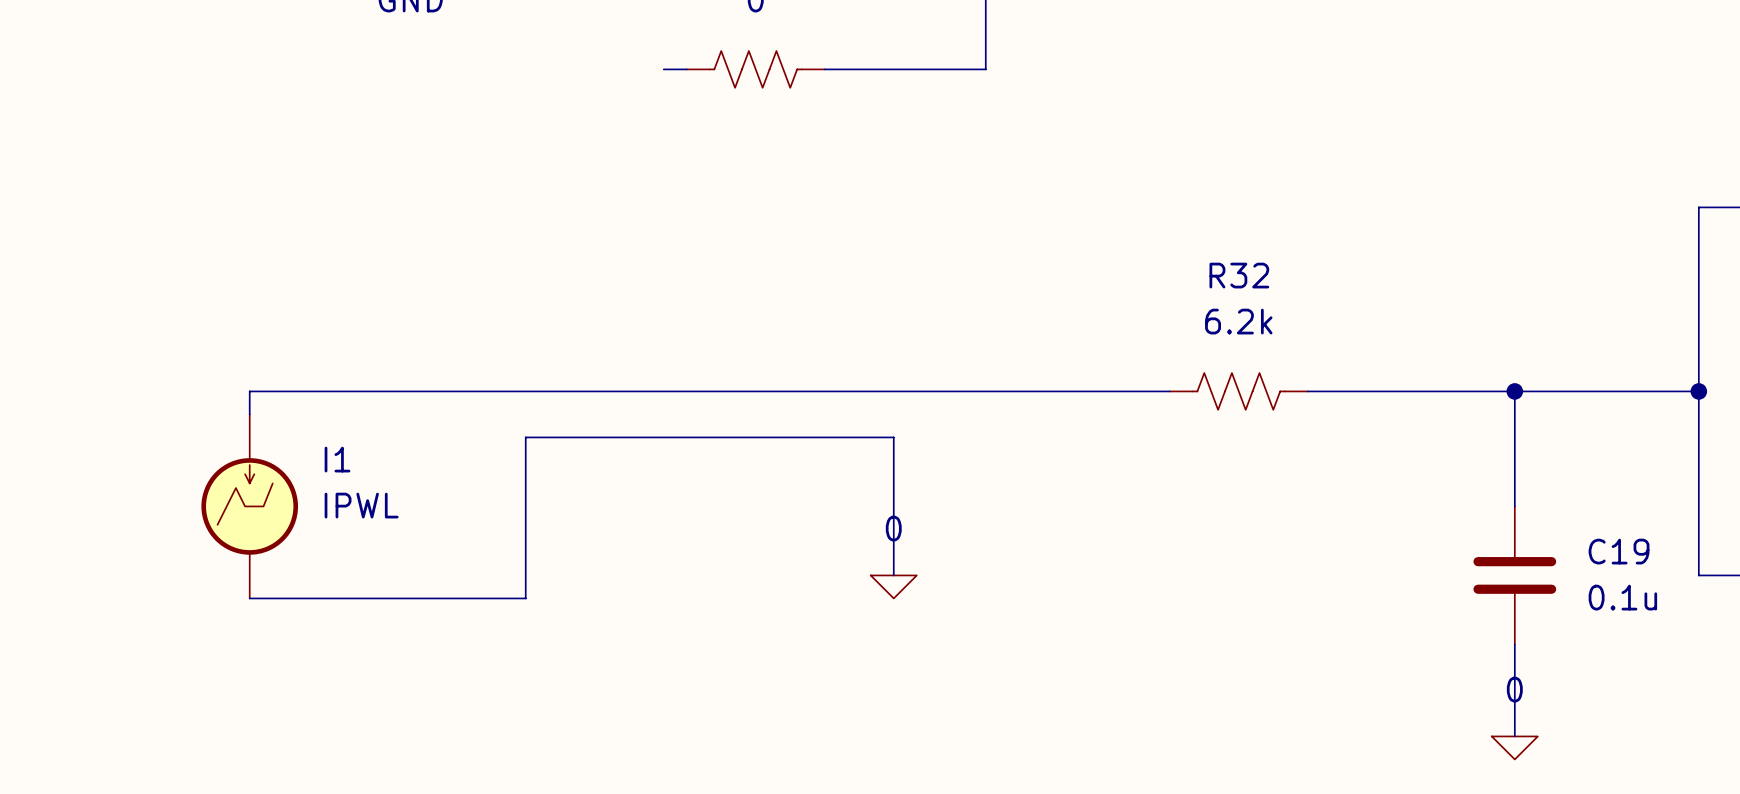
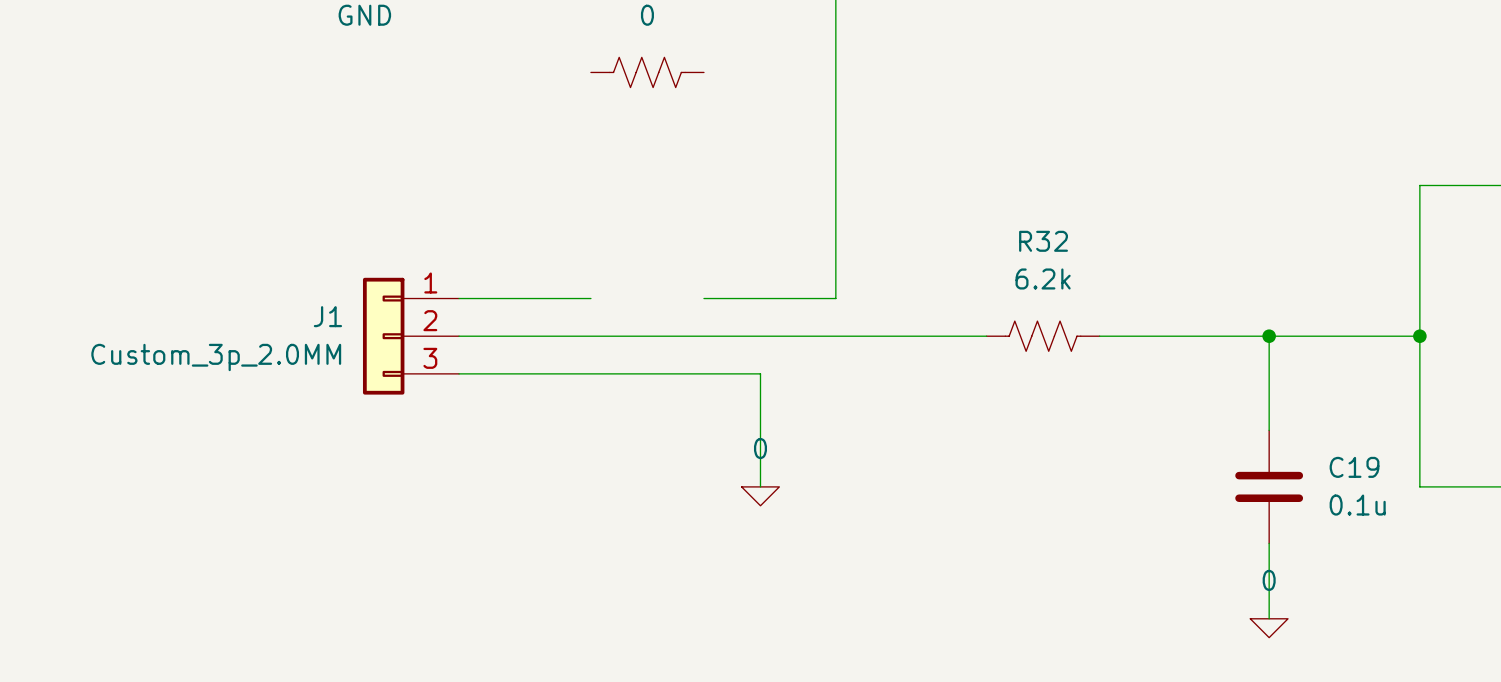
wire: (663, 69) (686, 69) -> none
wire: (824, 69) (985, 69) -> (703, 298) (835, 298) (835, 72)
wire: none -> (459, 298) (590, 298)
J1: none -> Custom_3p_2.0MM (411, 336)
wire: (525, 391) (249, 391) (249, 414) -> none
wire: (525, 437) (525, 598) (249, 598) -> none
I1: IPWL (249, 506) -> none

